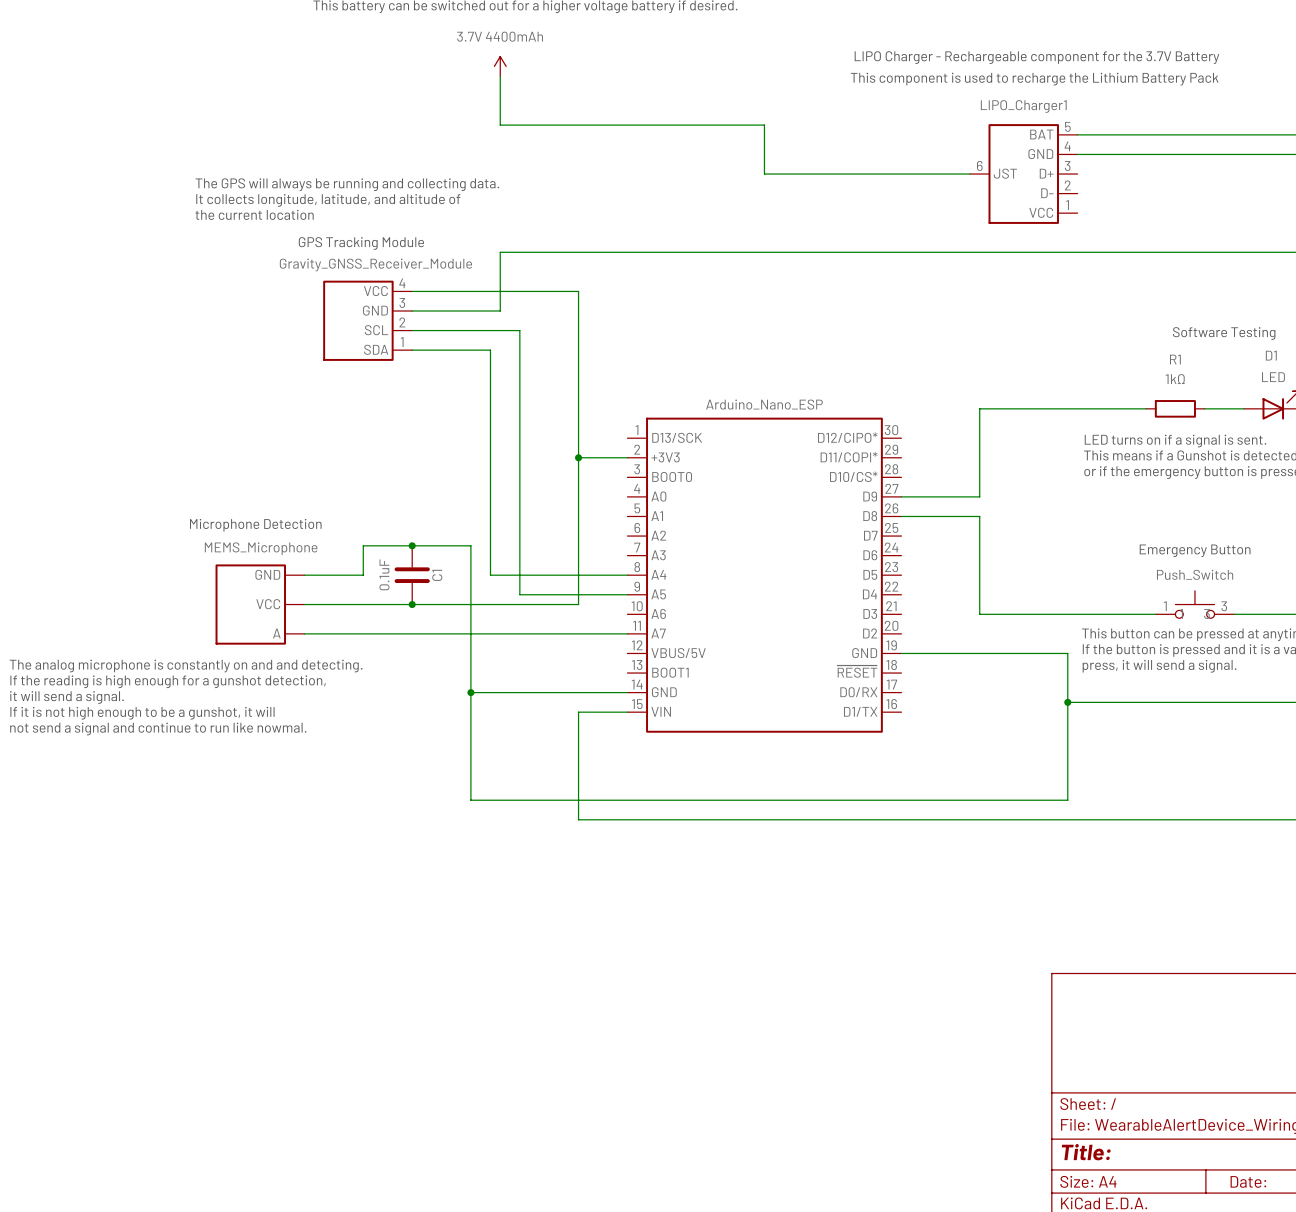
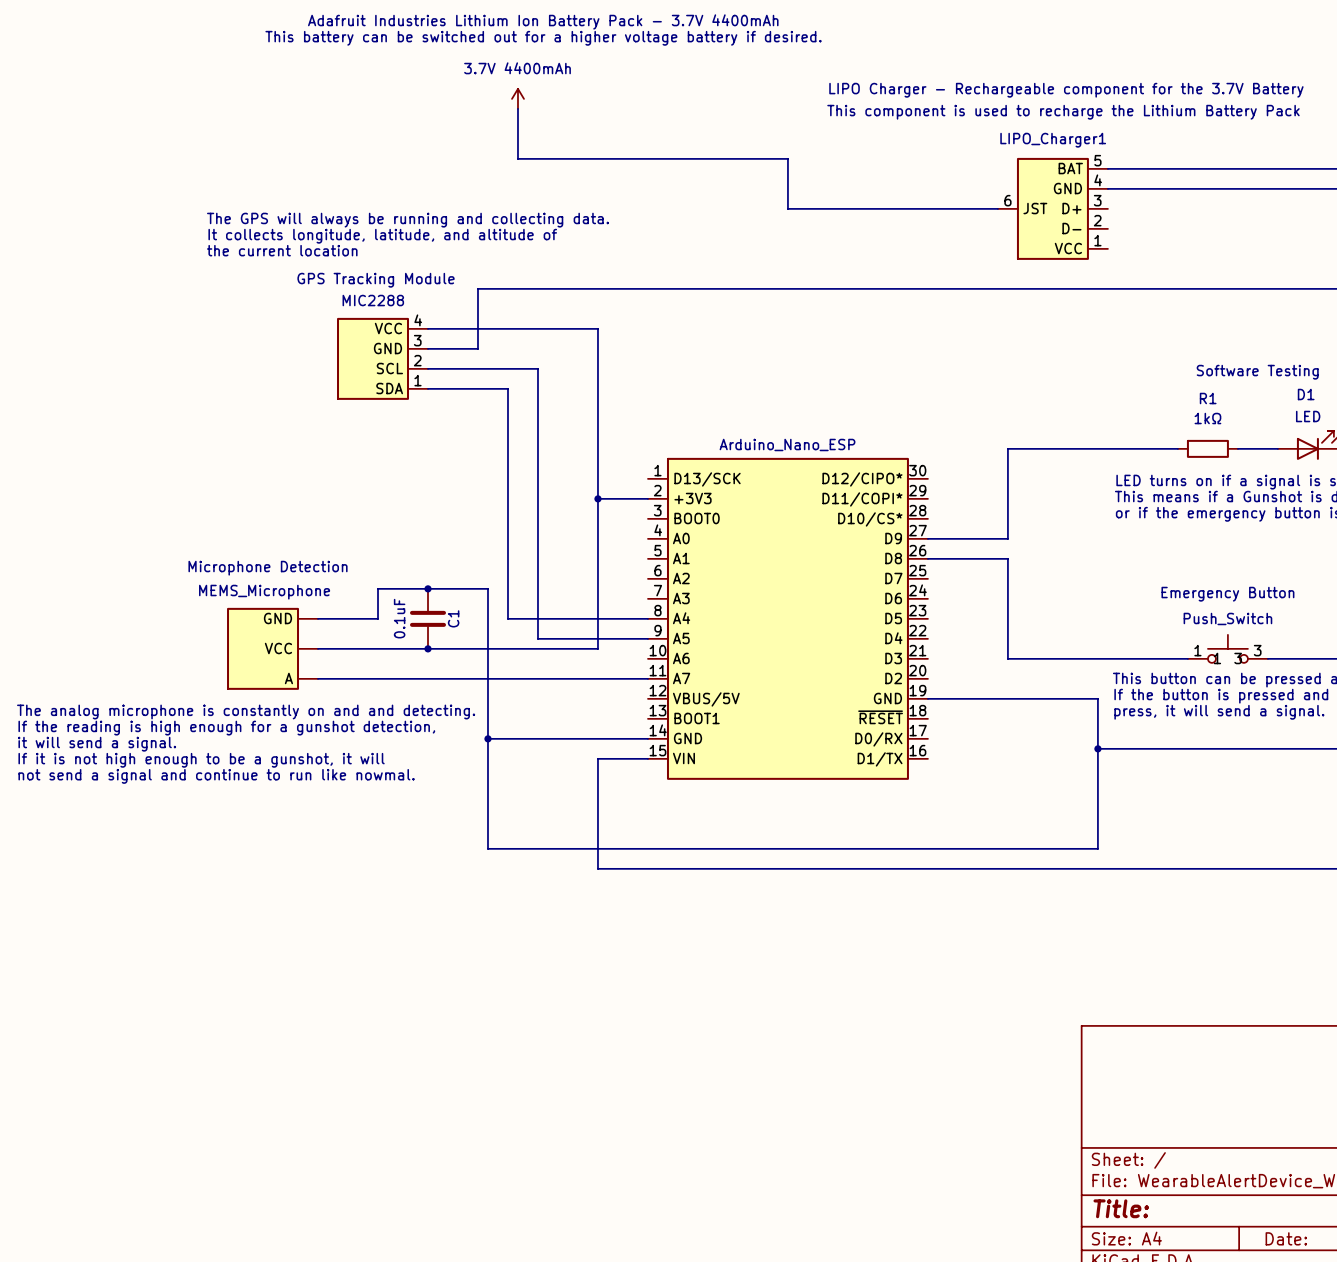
wire: (500, 252) (500, 311) (461, 311) -> (517, 288) (477, 288) (477, 348)
Gravity_GNSS_Receiver_Module name: Gravity_GNSS_Receiver_Module (375, 265) -> MIC2288 (373, 300)

